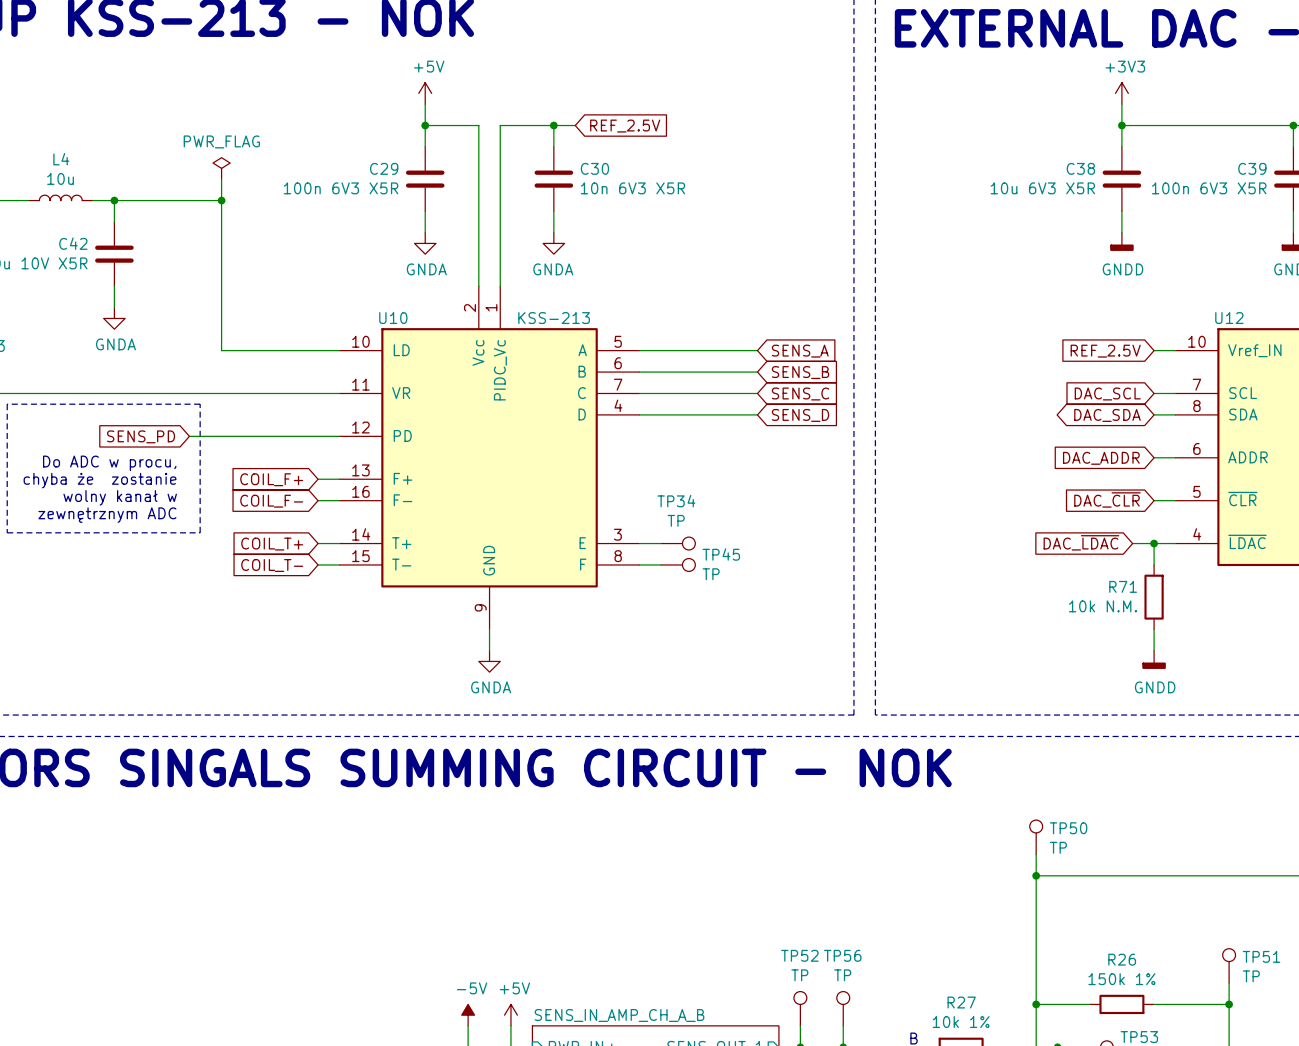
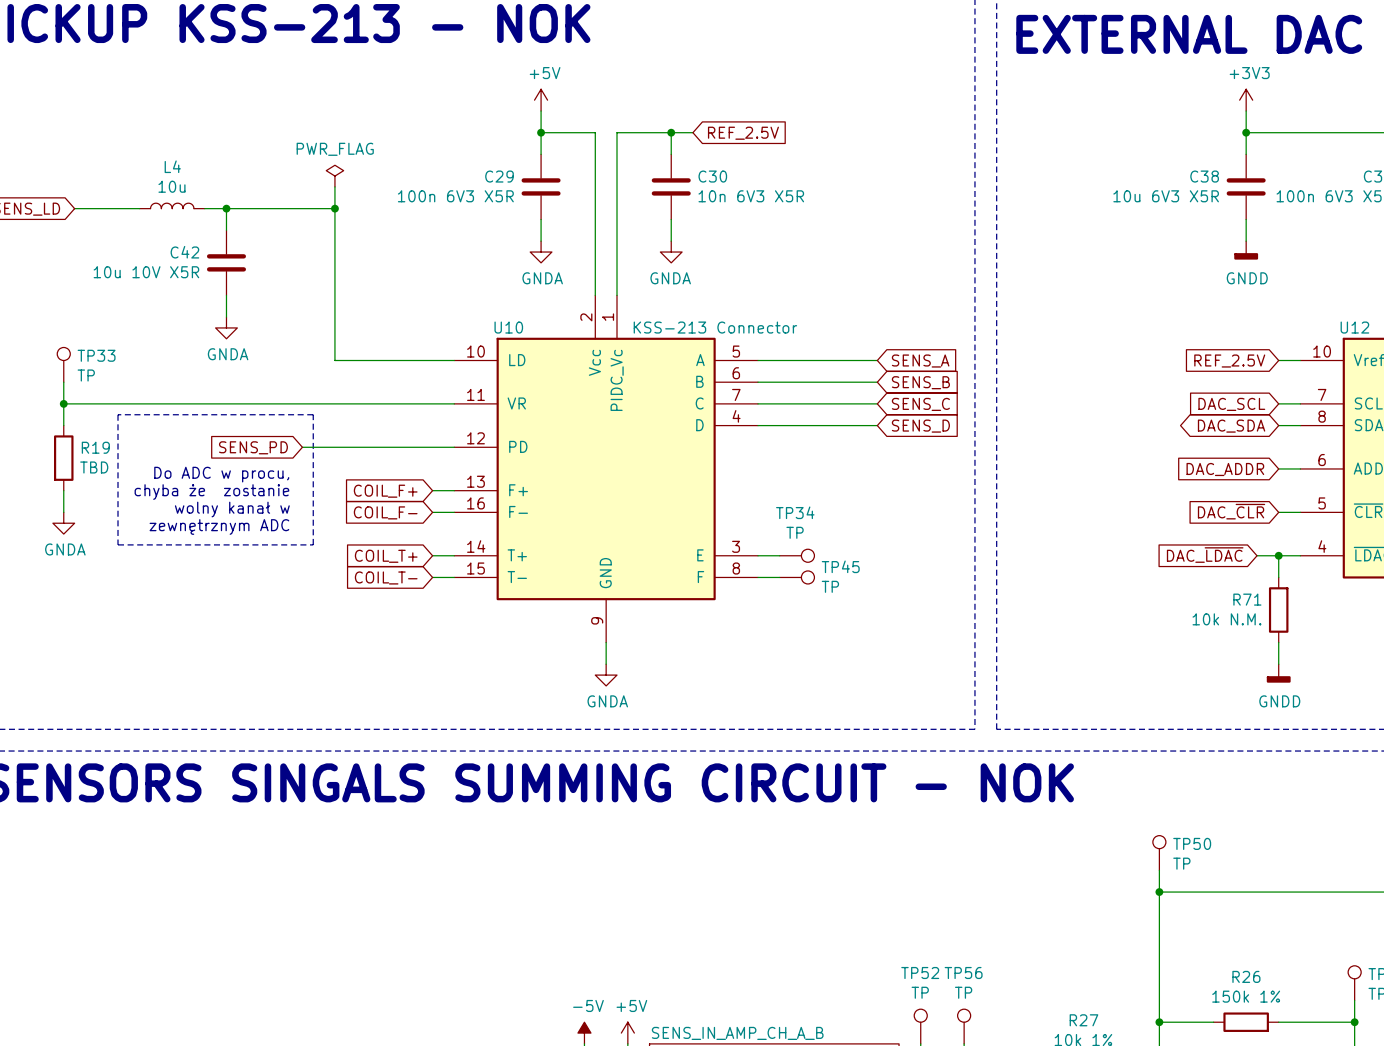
U10 value: KSS-213 (554, 318) -> KSS-213 Connector (715, 327)

